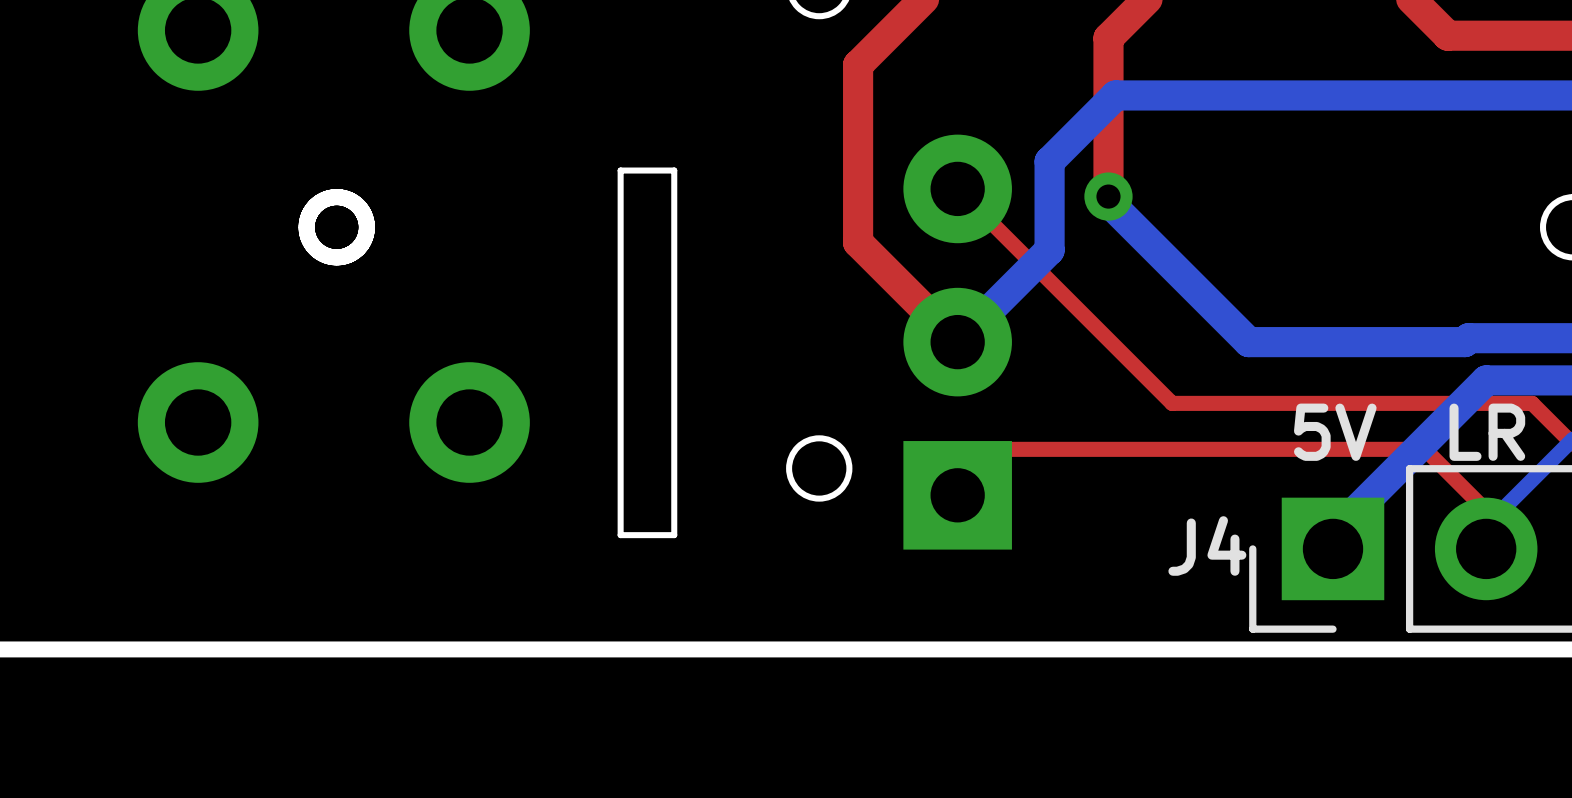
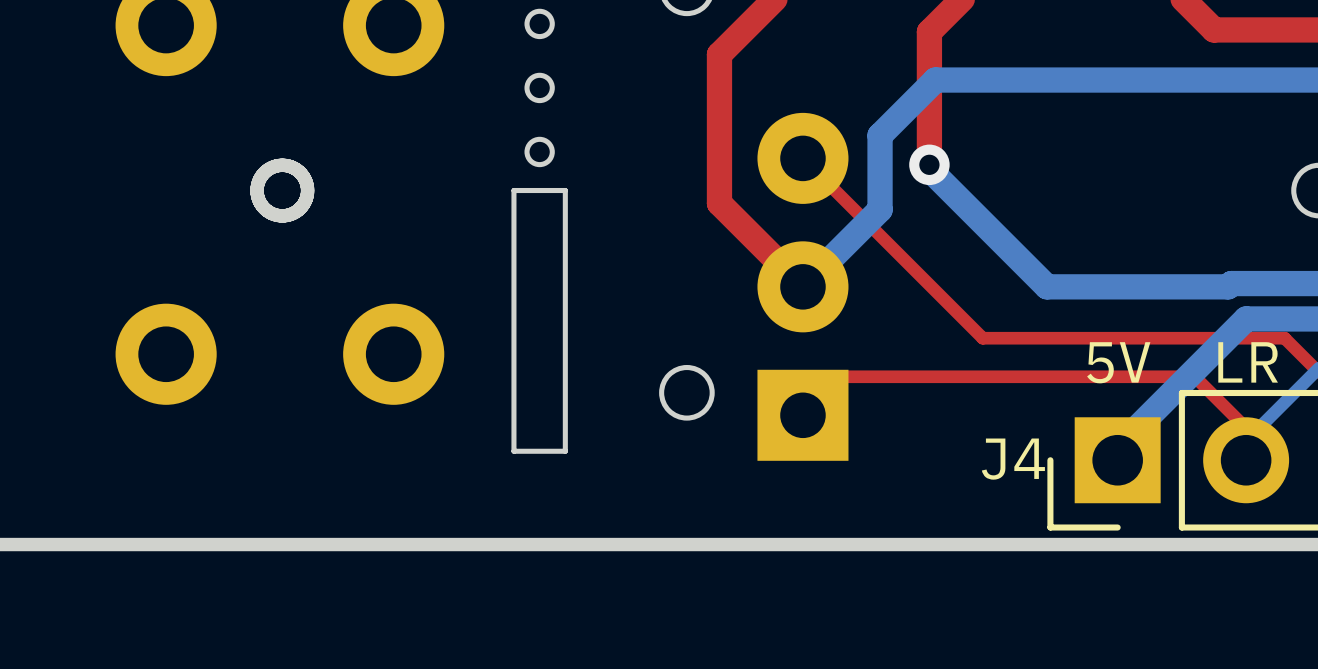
round board edge: none -> [524, 8, 555, 40]
round board edge: none -> [524, 72, 555, 104]
round board edge: none -> [524, 136, 555, 168]
board edge: (674, 227) (674, 170) (620, 170) (620, 535) (674, 535) -> (565, 190) (513, 190) (513, 451) (565, 451) (565, 448)

